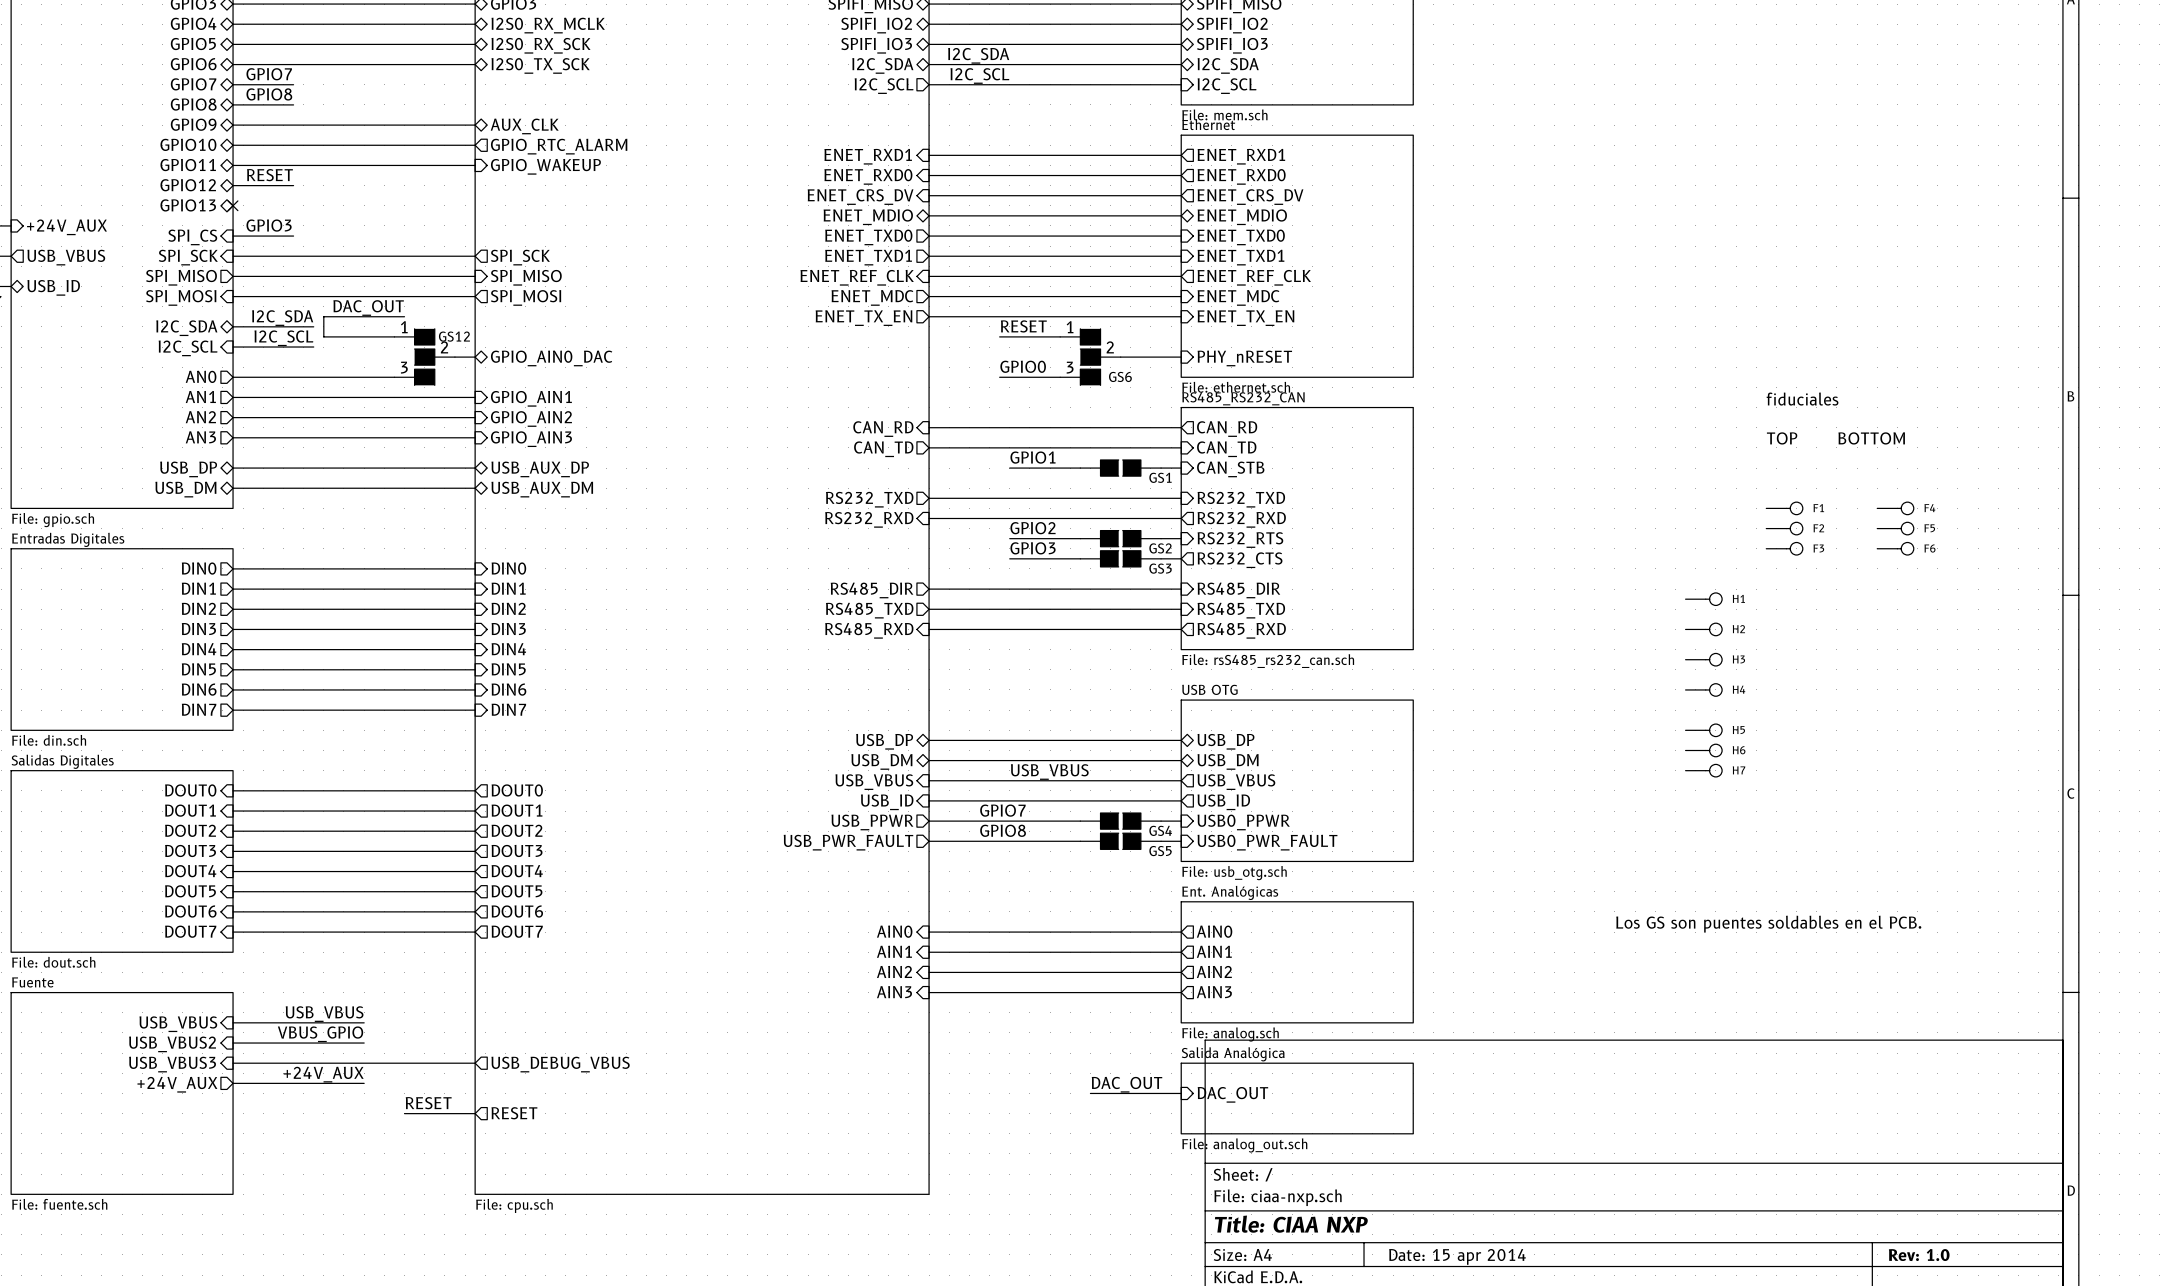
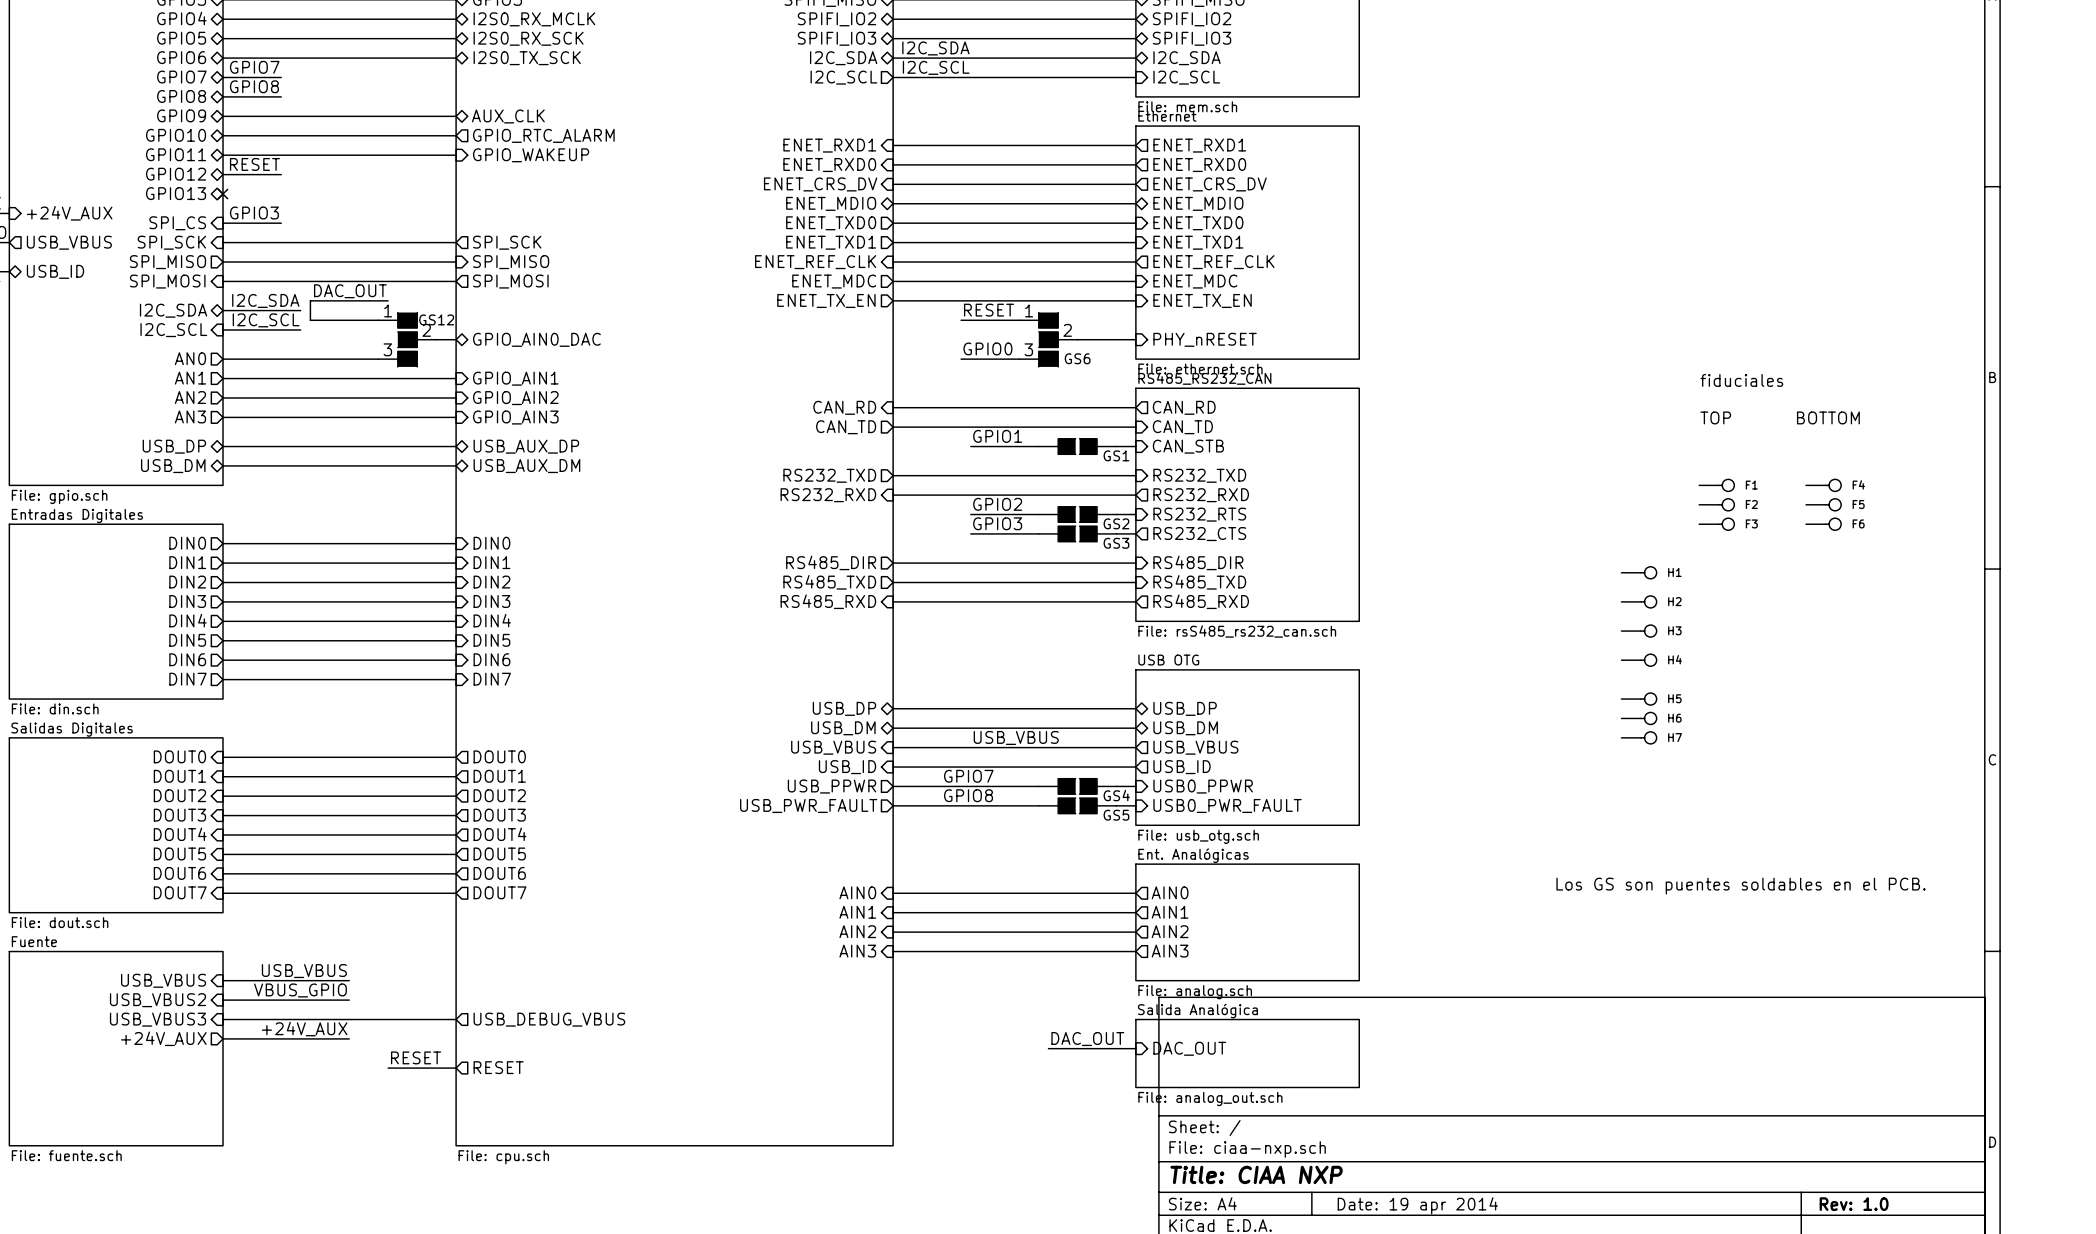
title block: Date: 15 apr 2014 (1457, 1256) -> Date: 19 apr 2014 (1417, 1205)

